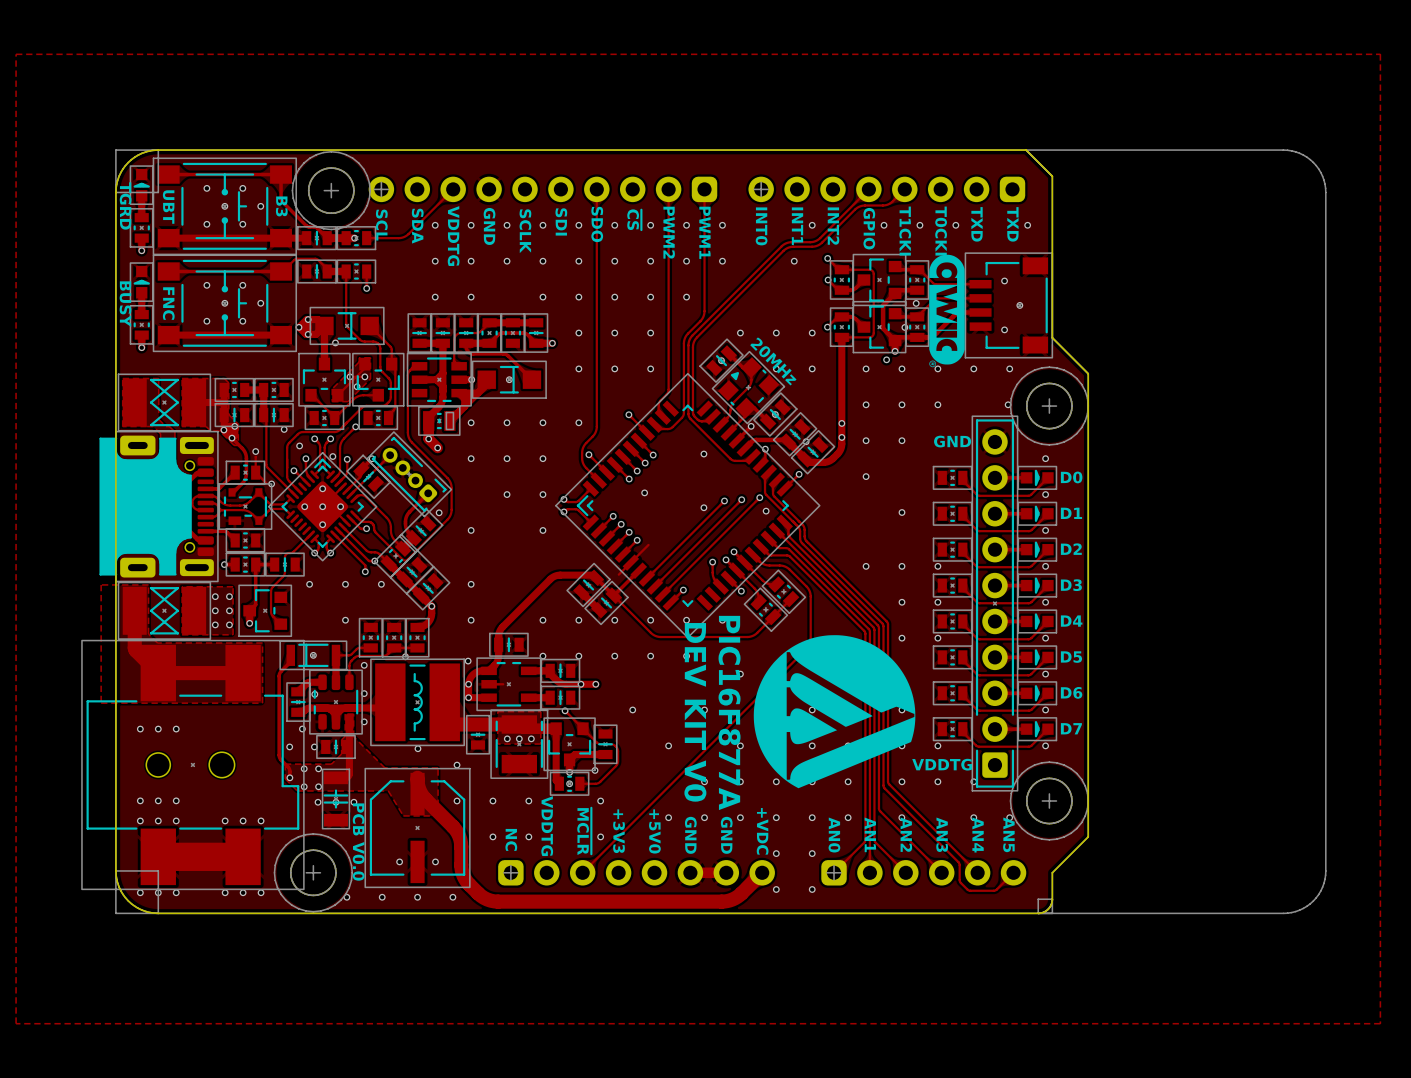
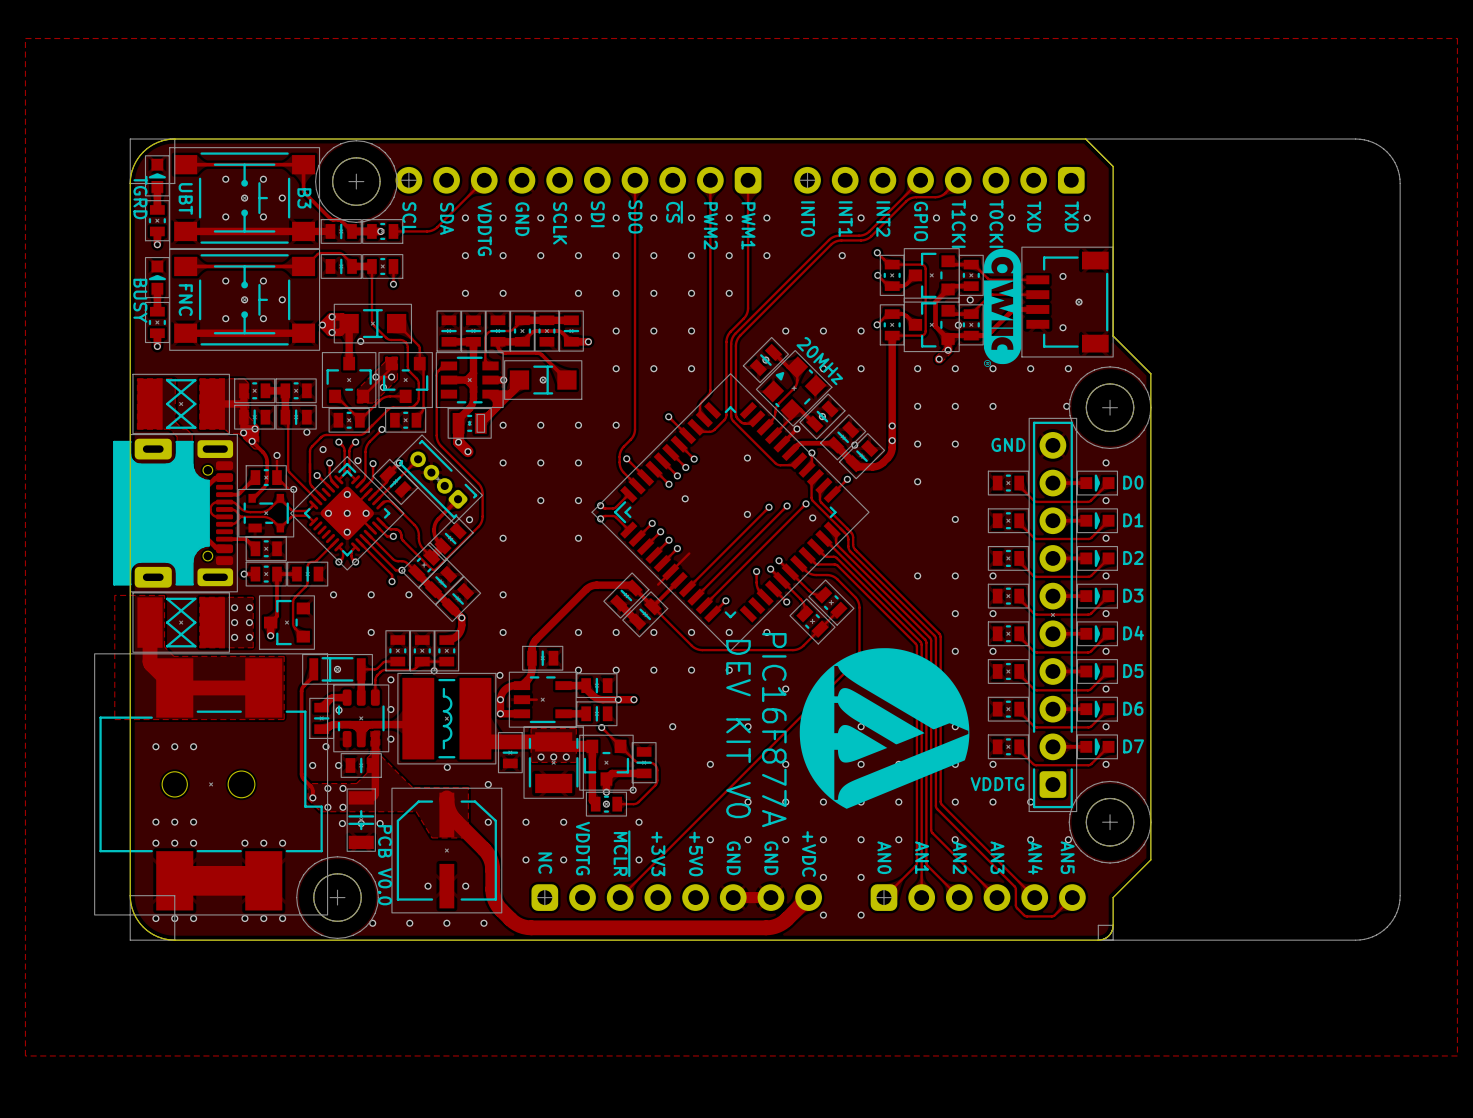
zone outline: none -> (946, 346) (949, 346) (951, 352) (941, 362) (937, 362) (935, 357) (946, 346)

